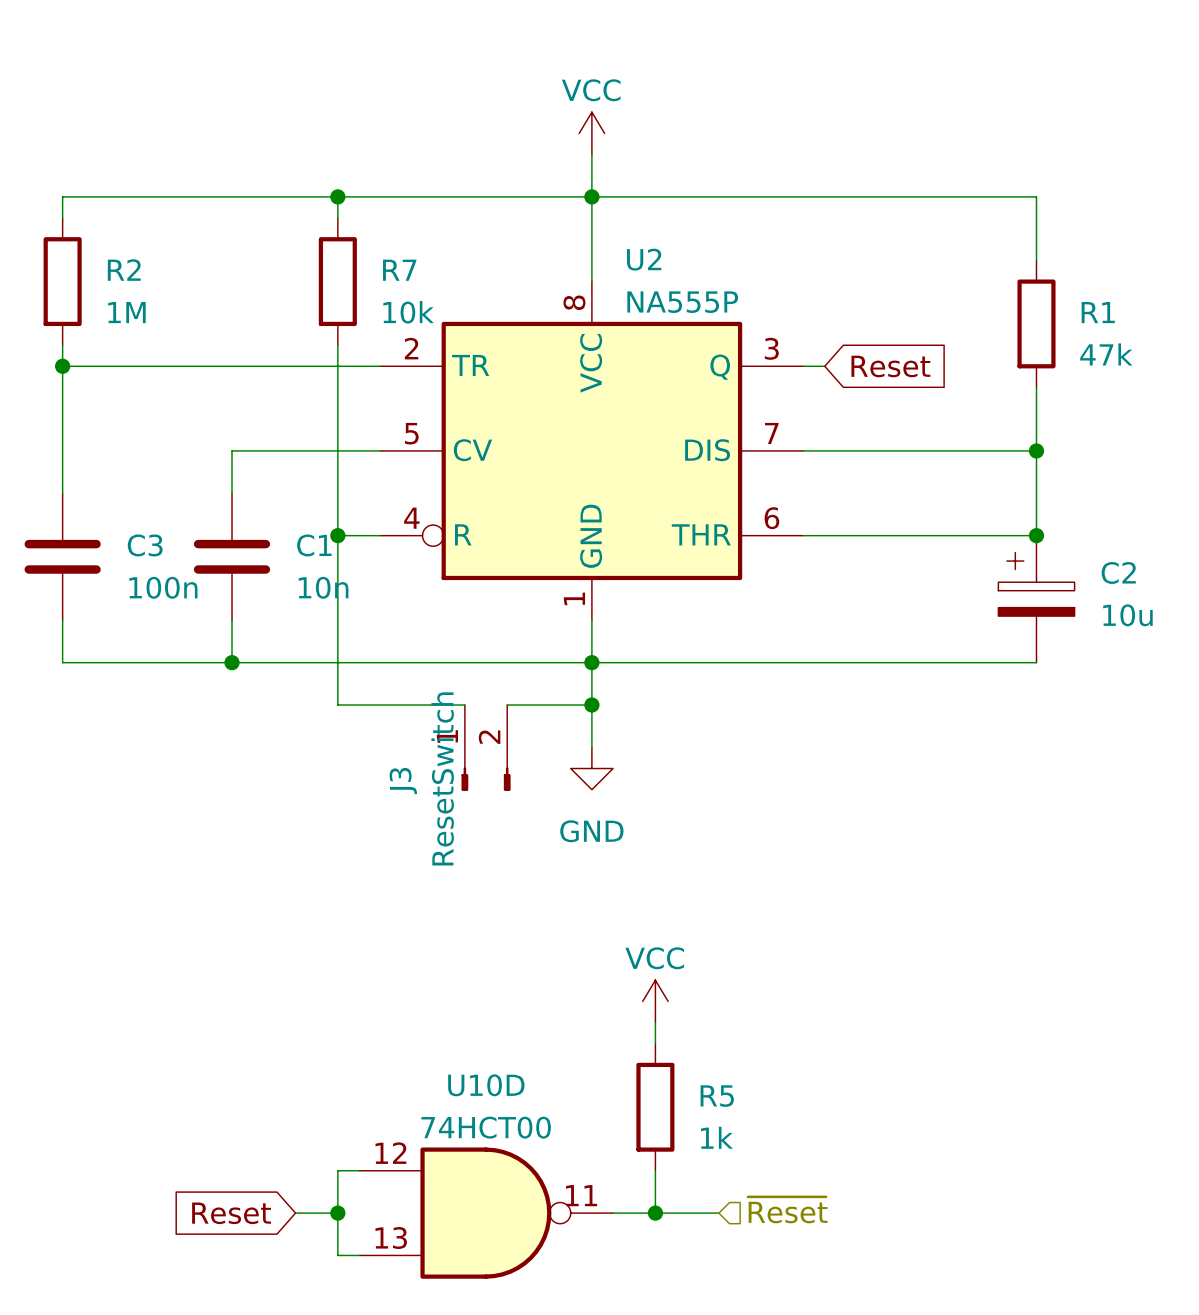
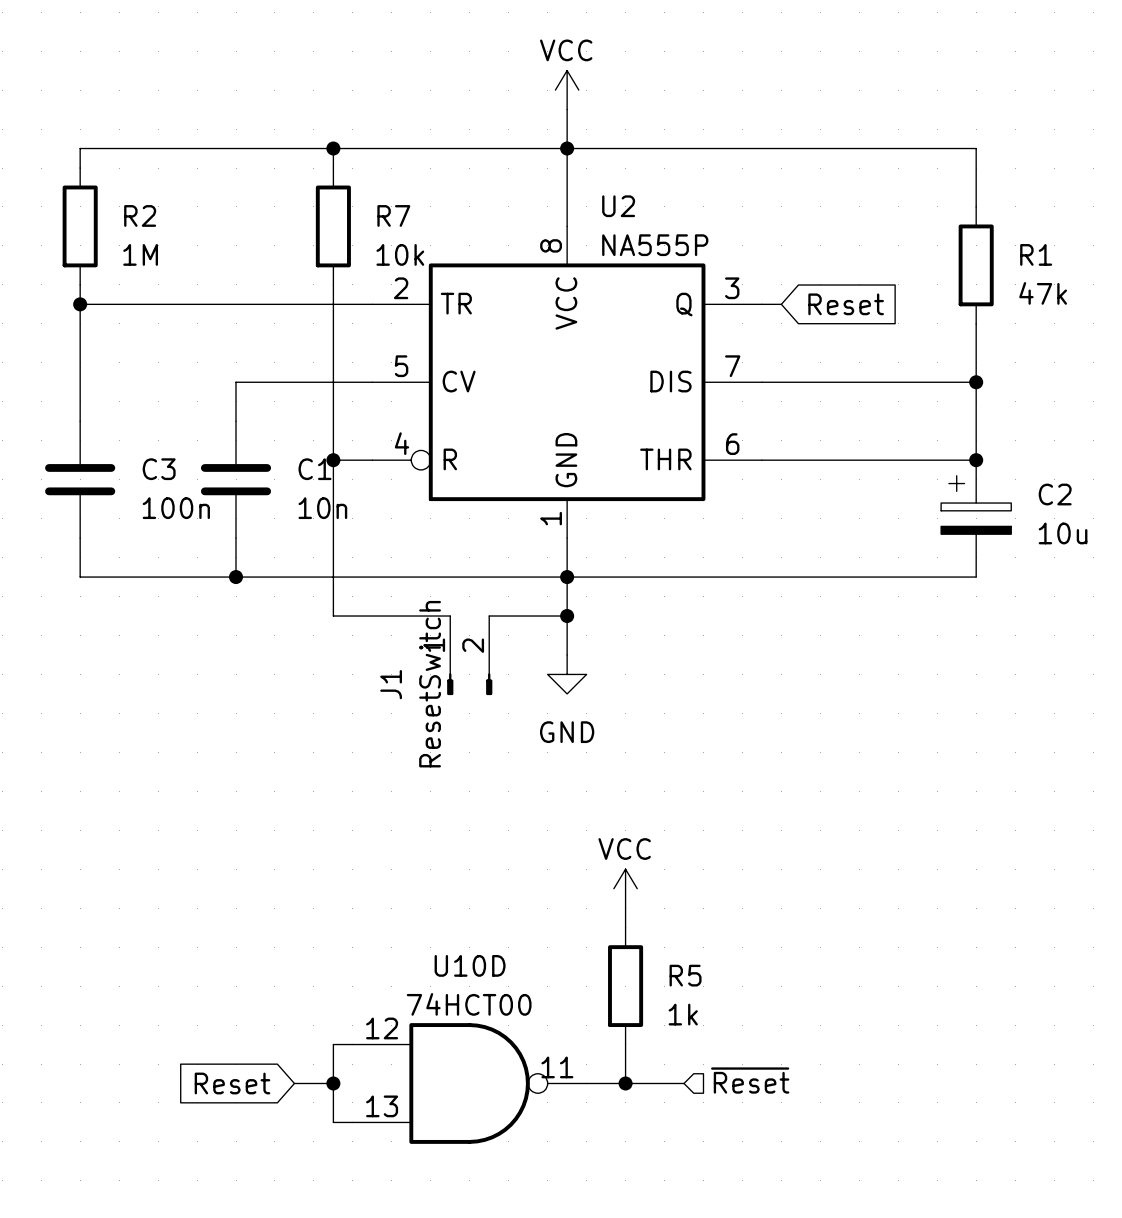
J3 name: J3 (403, 781) -> J1 (391, 684)

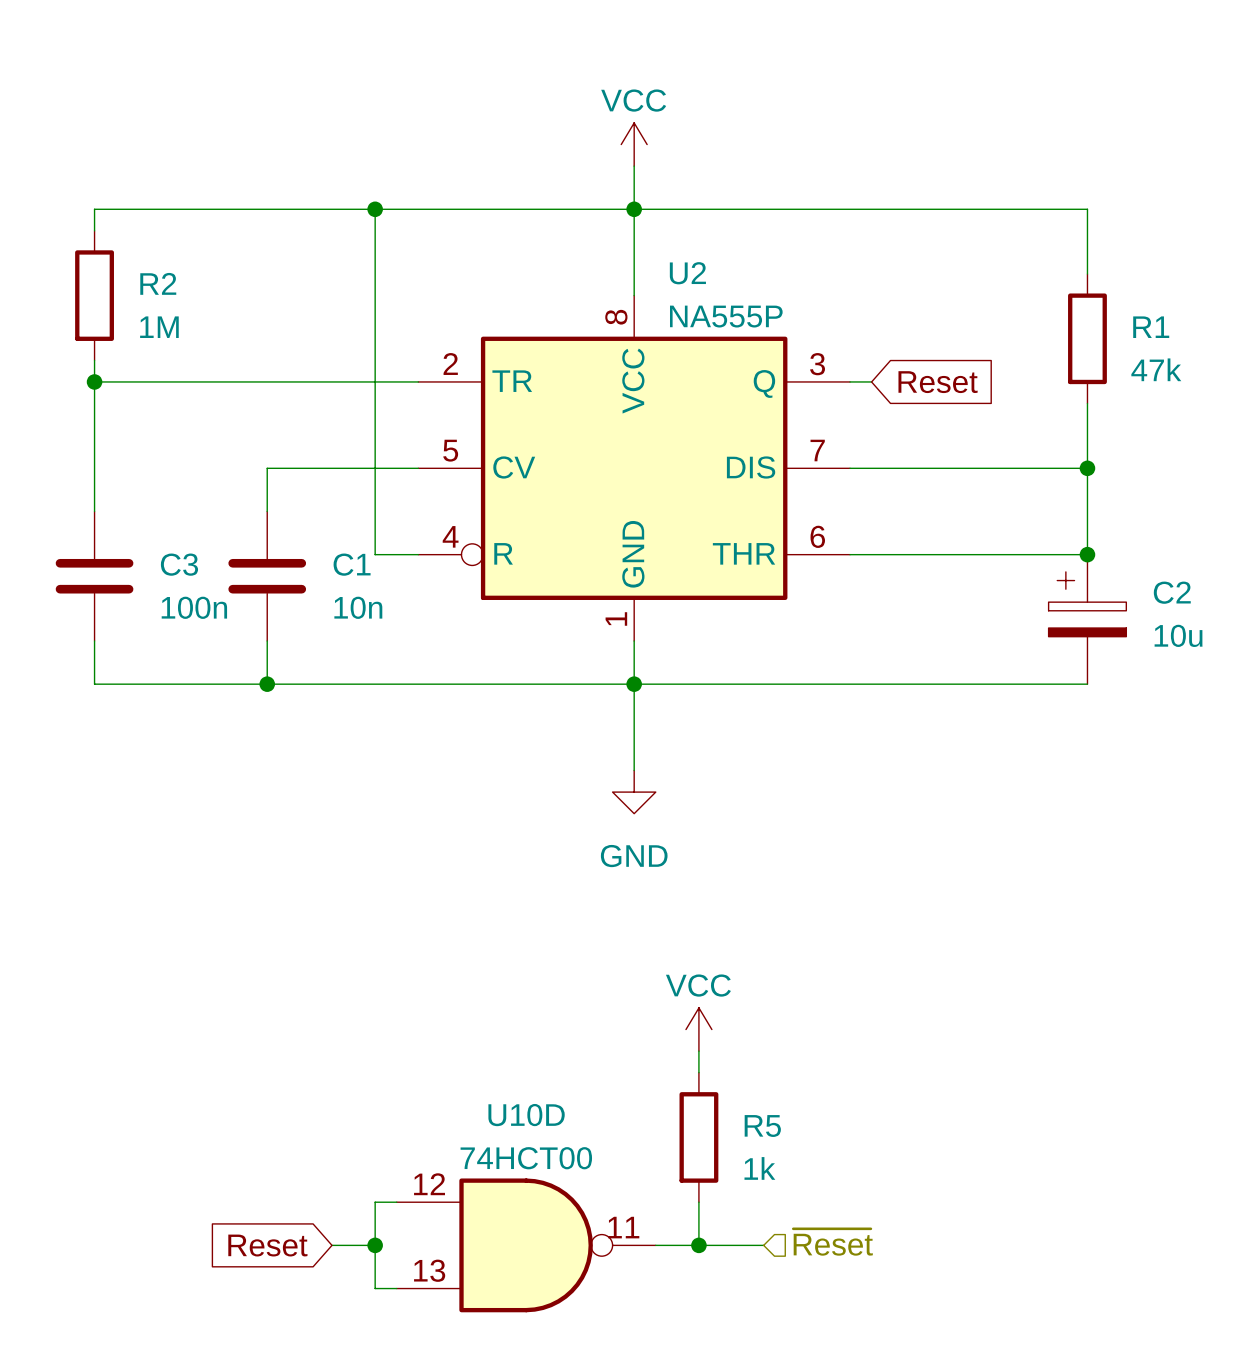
wire: none -> (375, 230) (375, 360)
R7: 10k (333, 226) -> none
wire: (333, 460) (333, 616) (450, 616) -> none
junction: (333, 460) -> none
wire: (489, 616) (567, 616) -> none
junction: (567, 616) -> none
J1: ResetSwitch (469, 655) -> none

